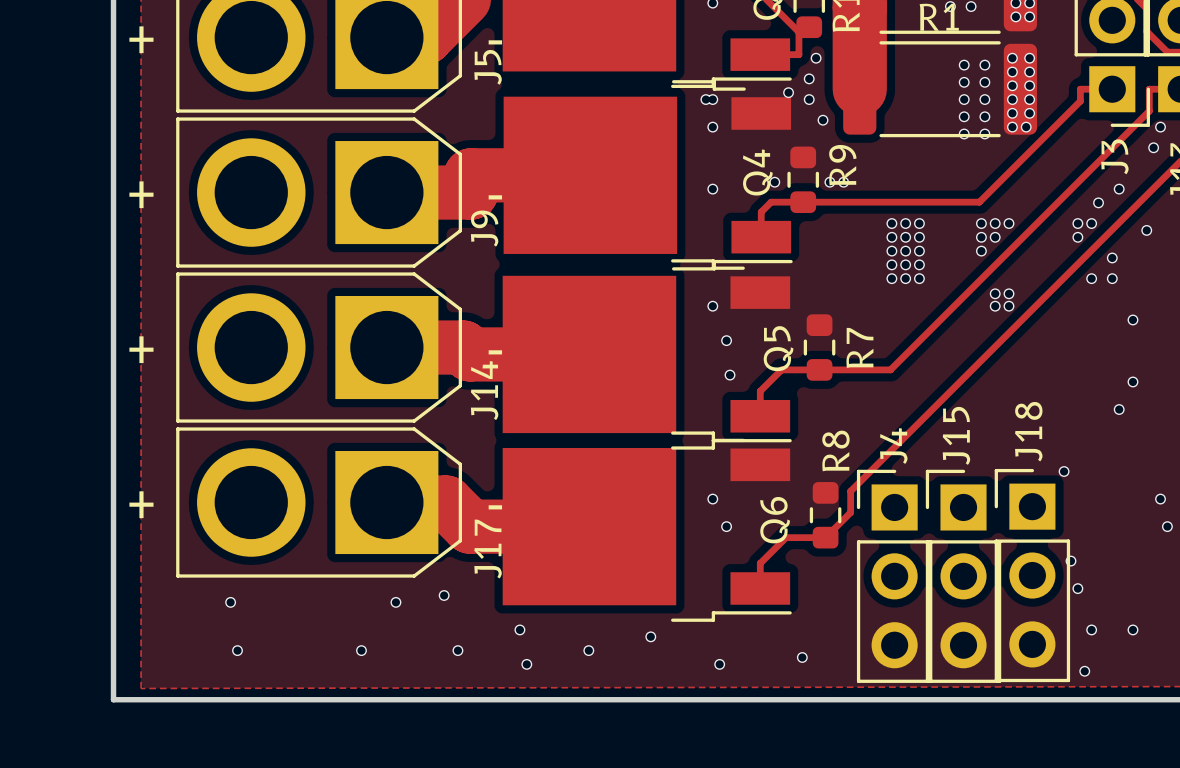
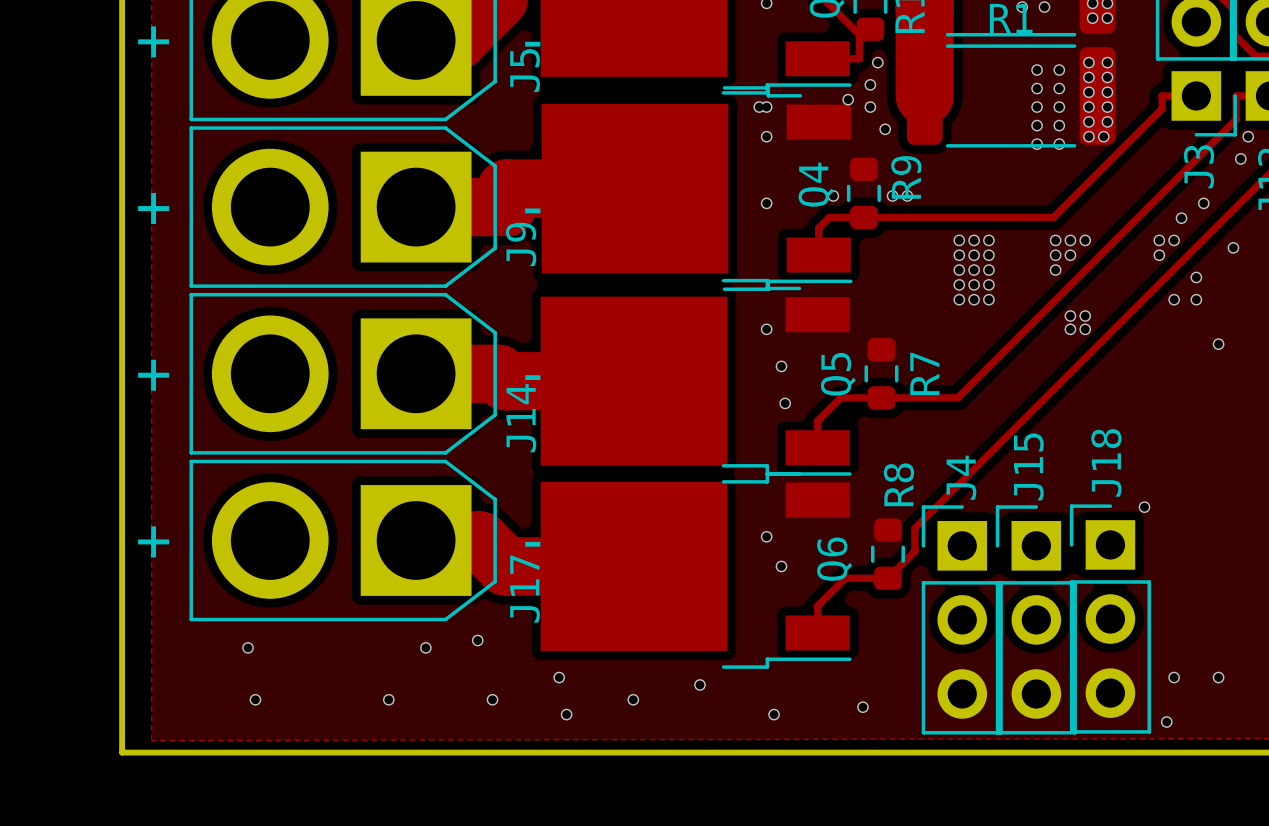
via: (1132, 381) -> none
via: (1119, 409) -> none
via: (1160, 499) -> none
via: (1167, 526) -> none
via: (1070, 561) -> none
via: (1077, 588) -> none

